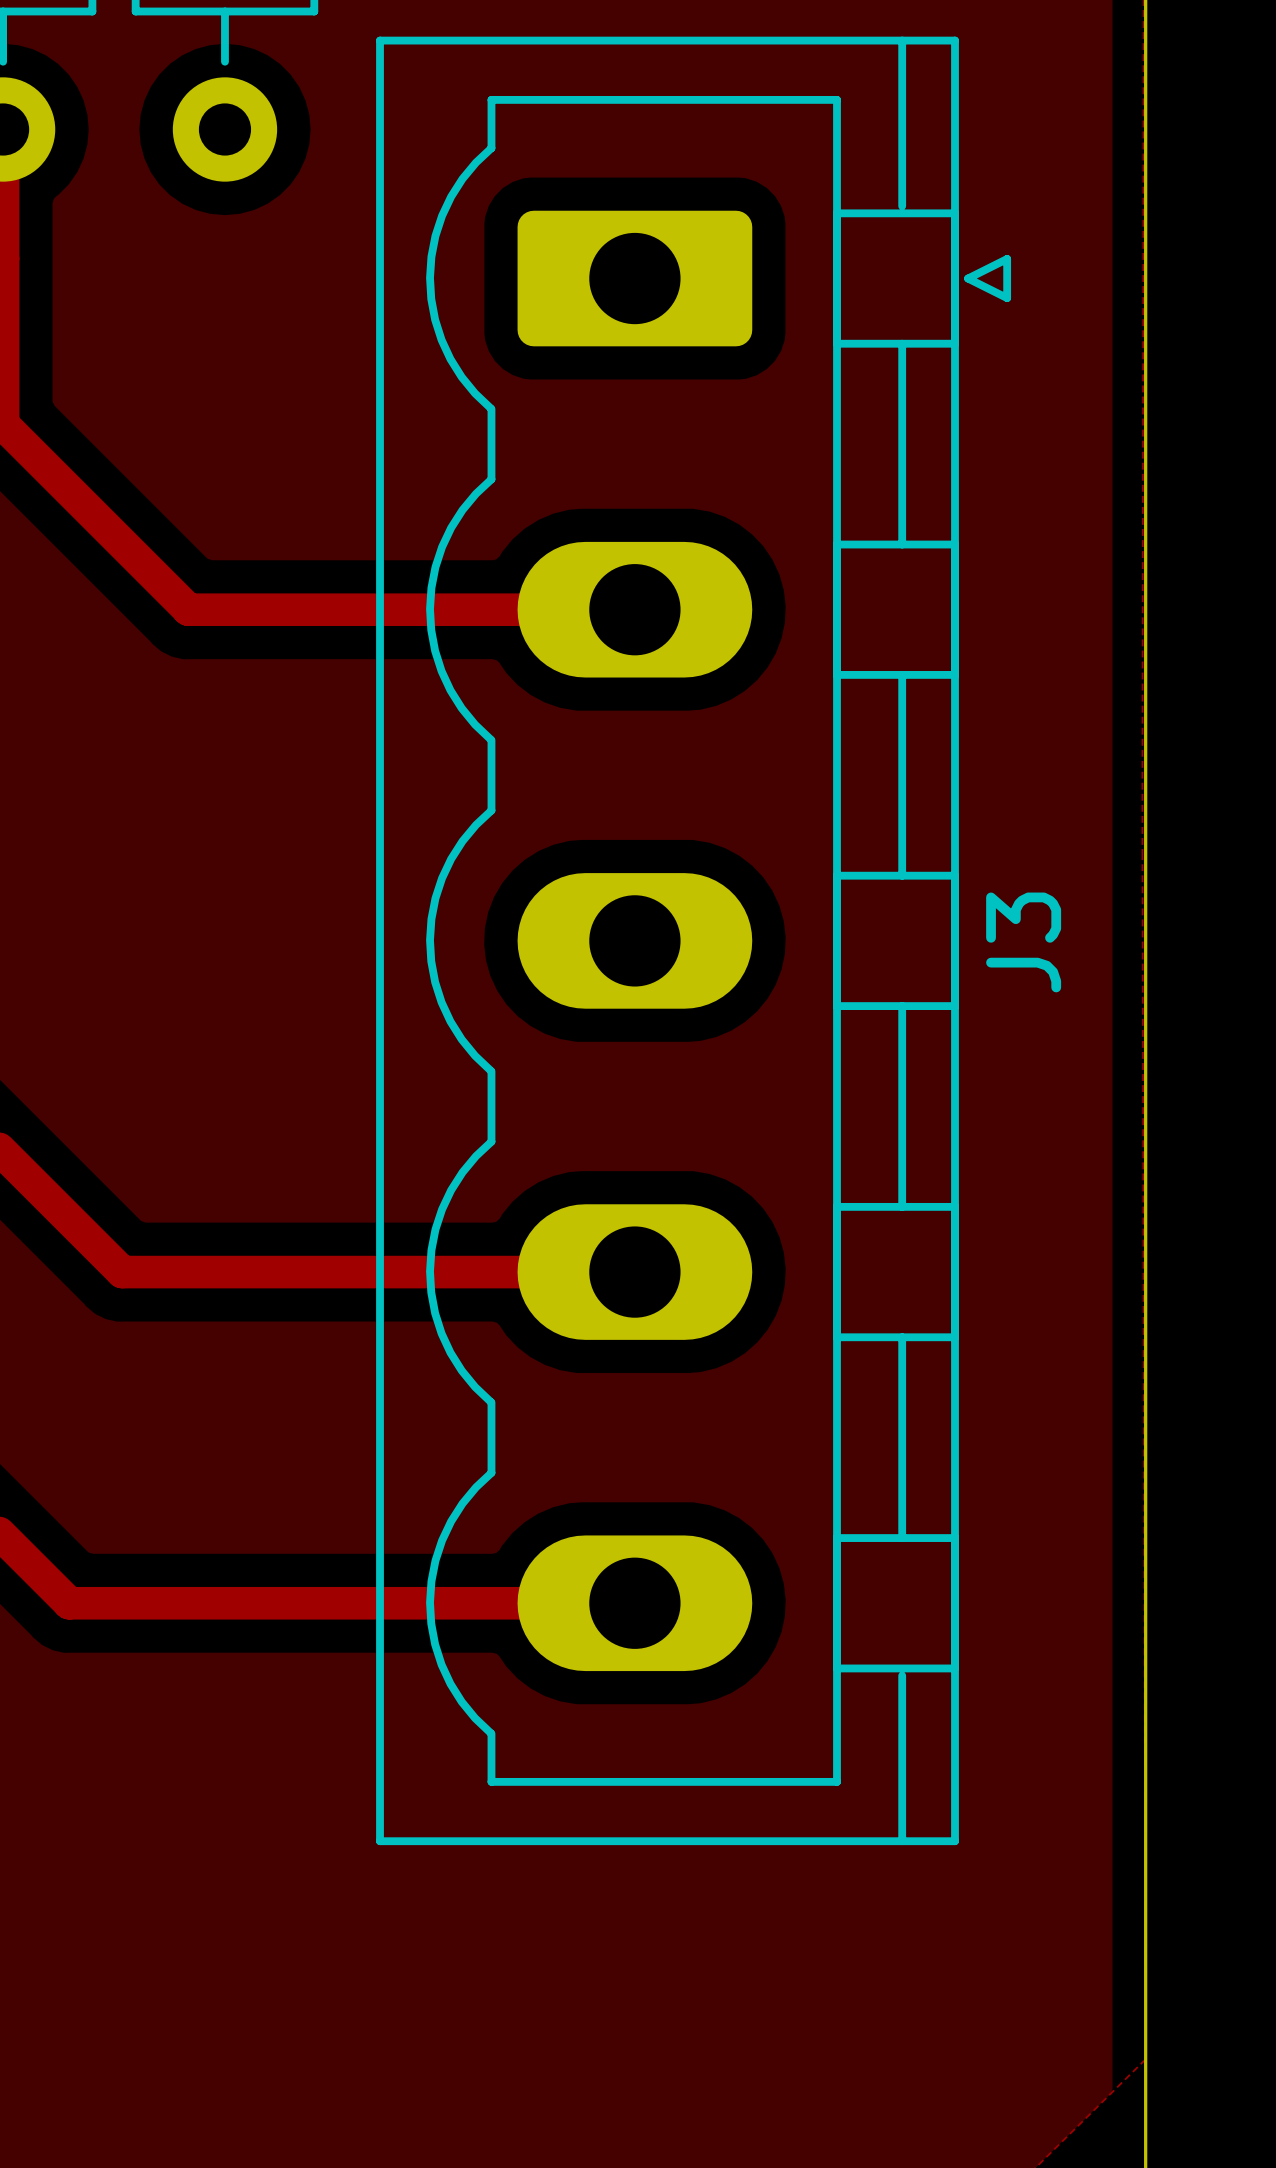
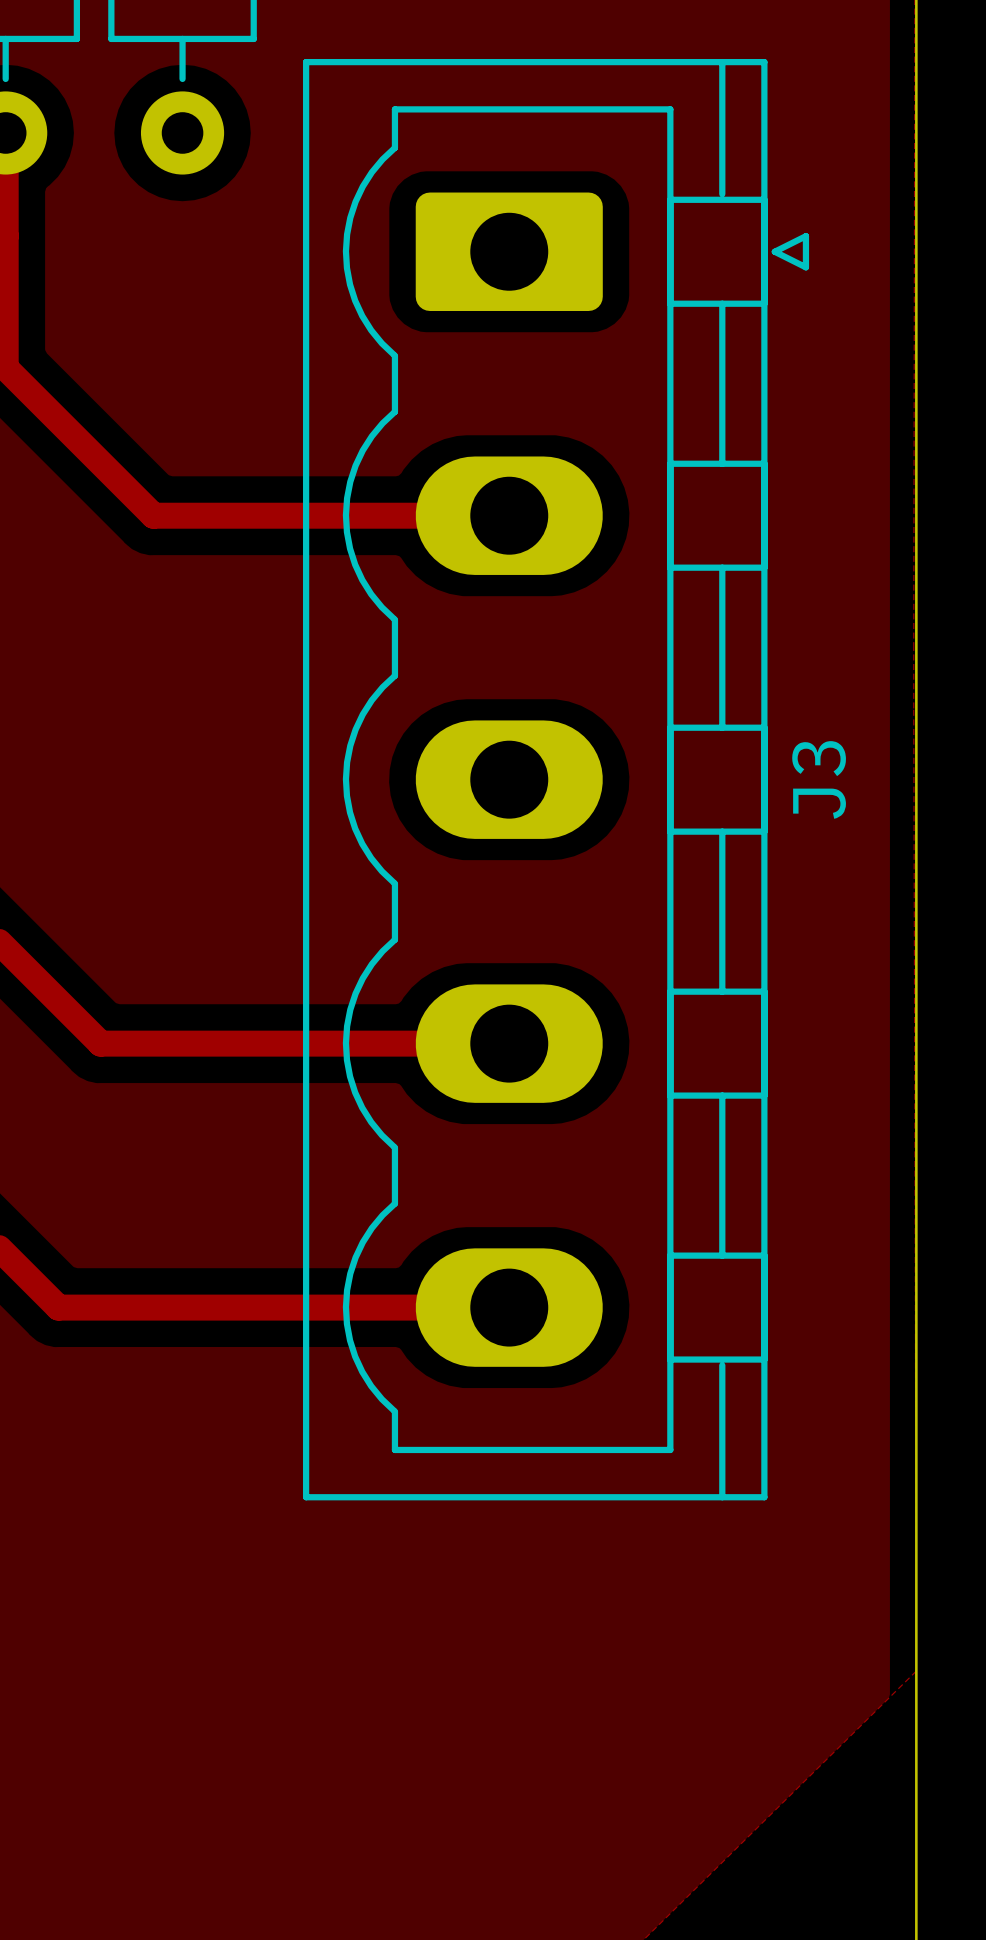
J3 footprint: [376, 36, 1012, 1846] -> [302, 58, 810, 1501]

